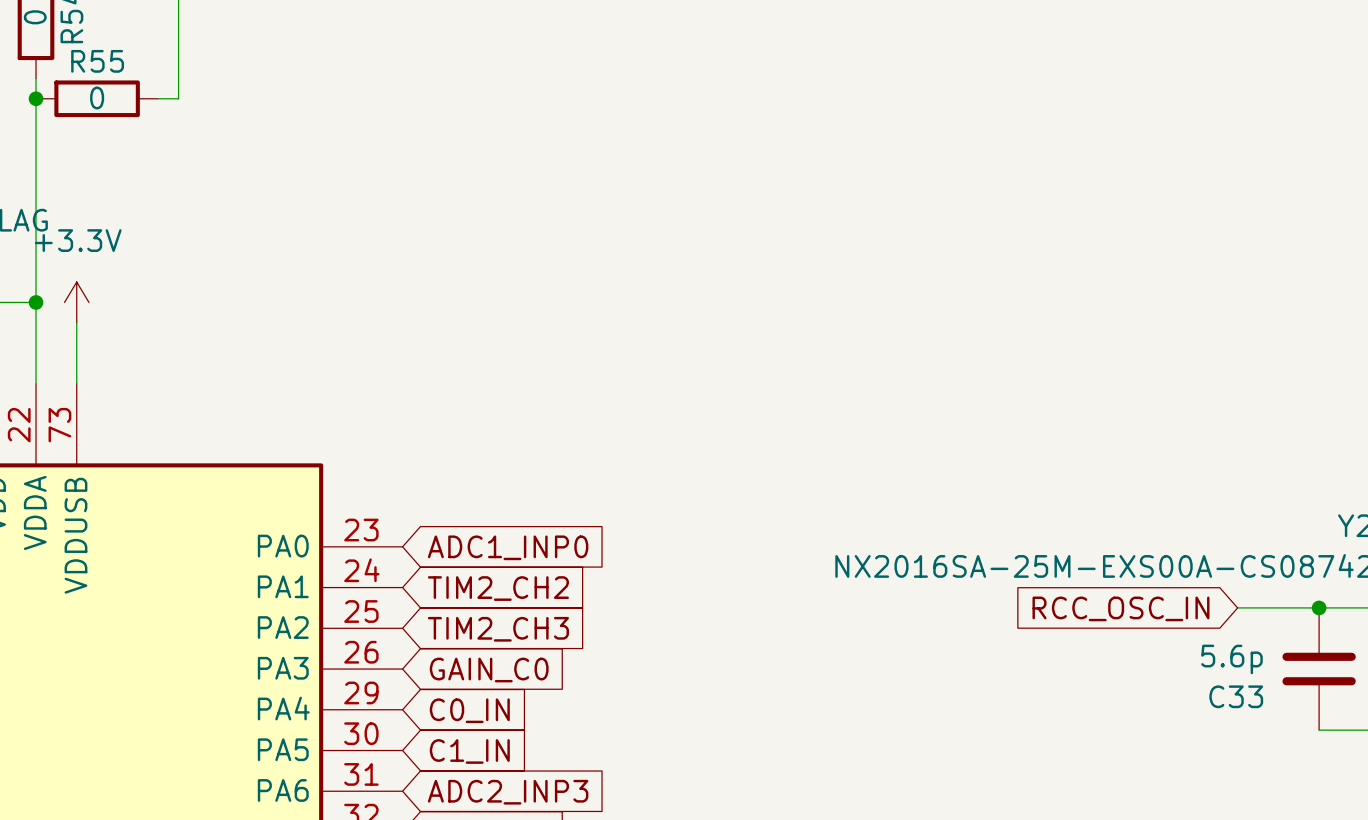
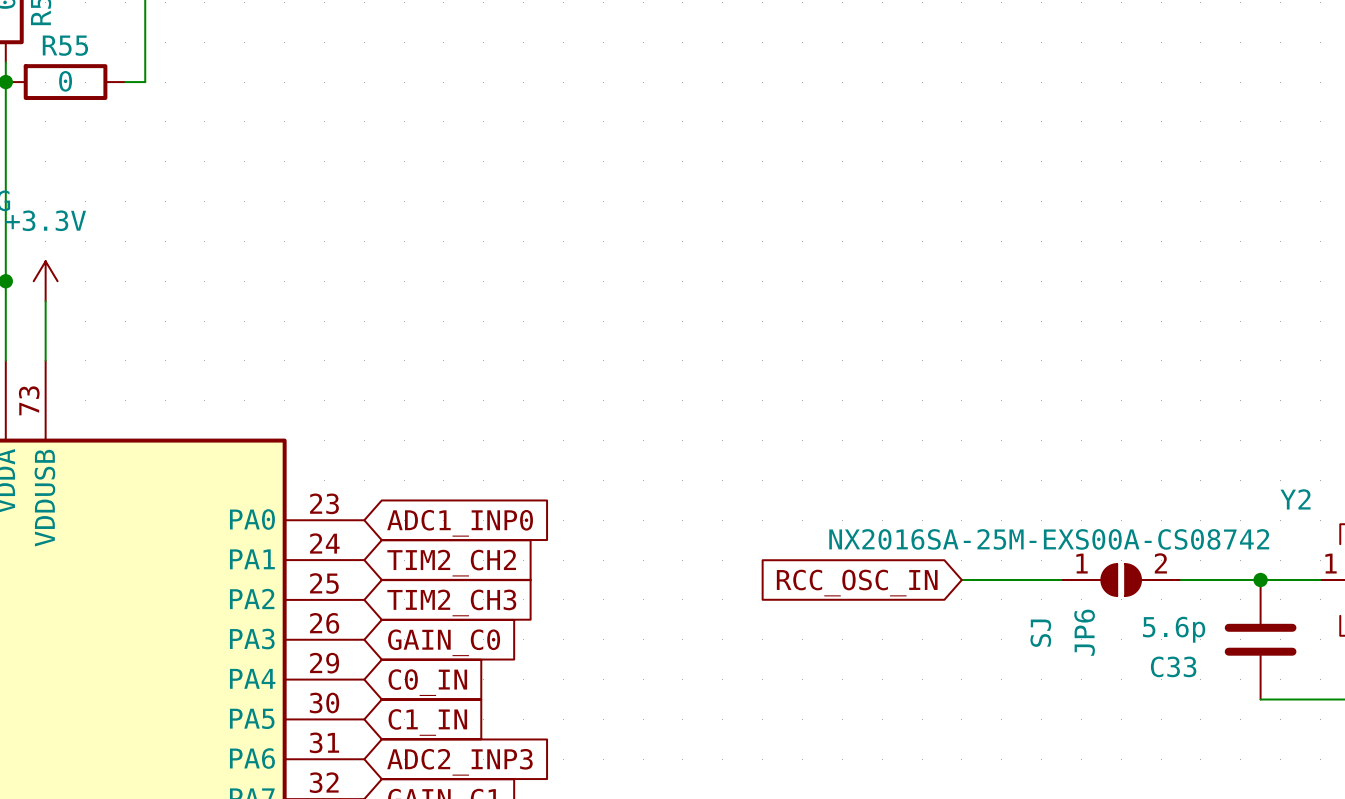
wire: none -> (961, 580) (1061, 580)
JP6: none -> SJ (1121, 580)
global label position: RCC_OSC_IN (1120, 608) -> RCC_OSC_IN (857, 583)

